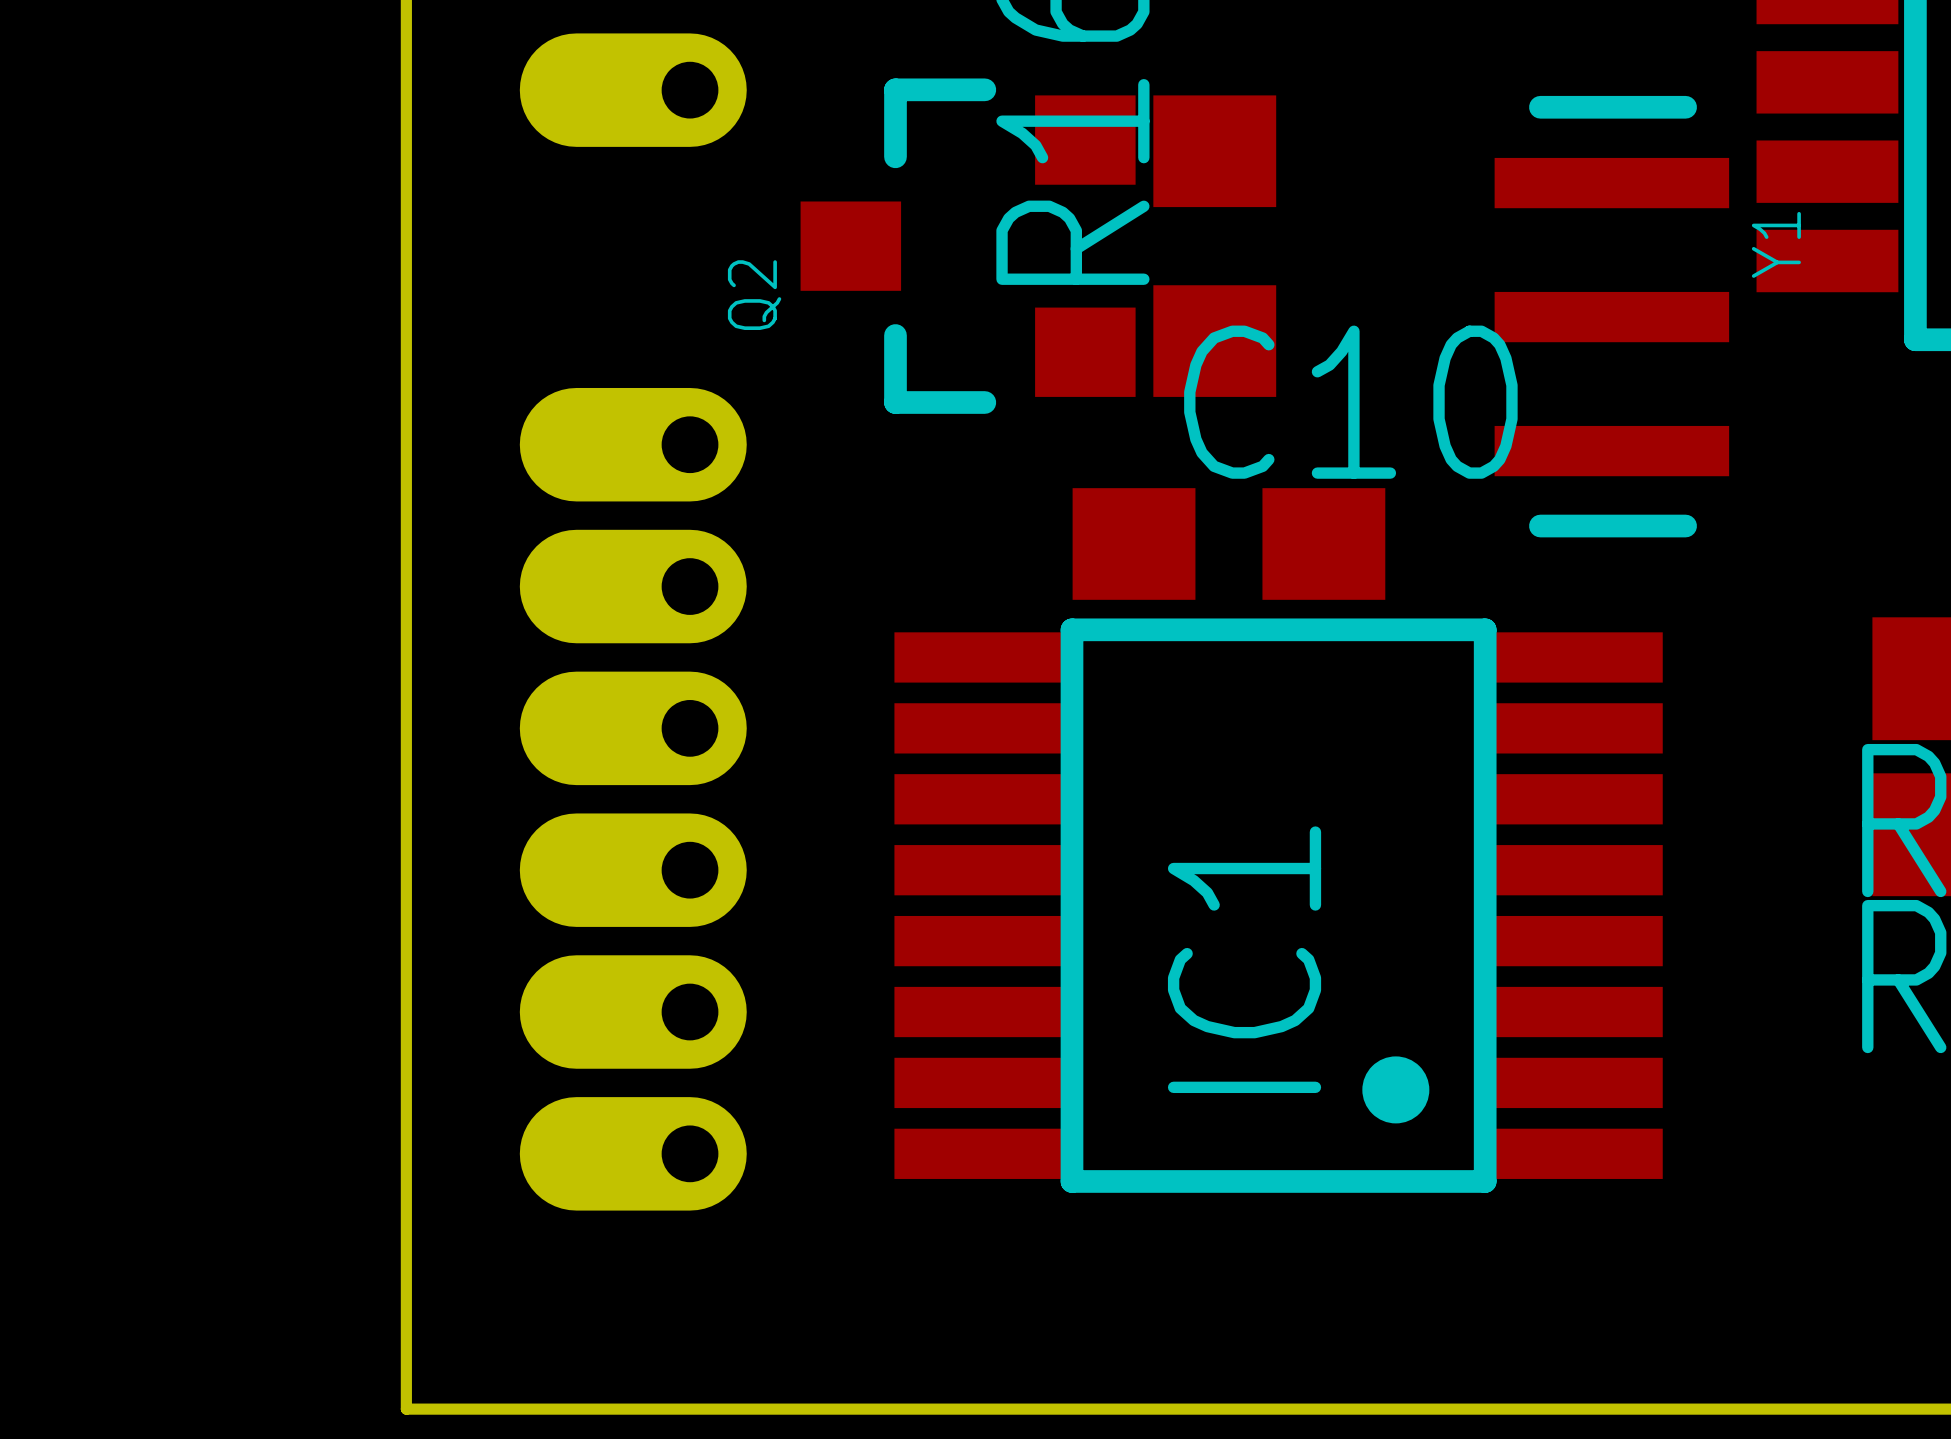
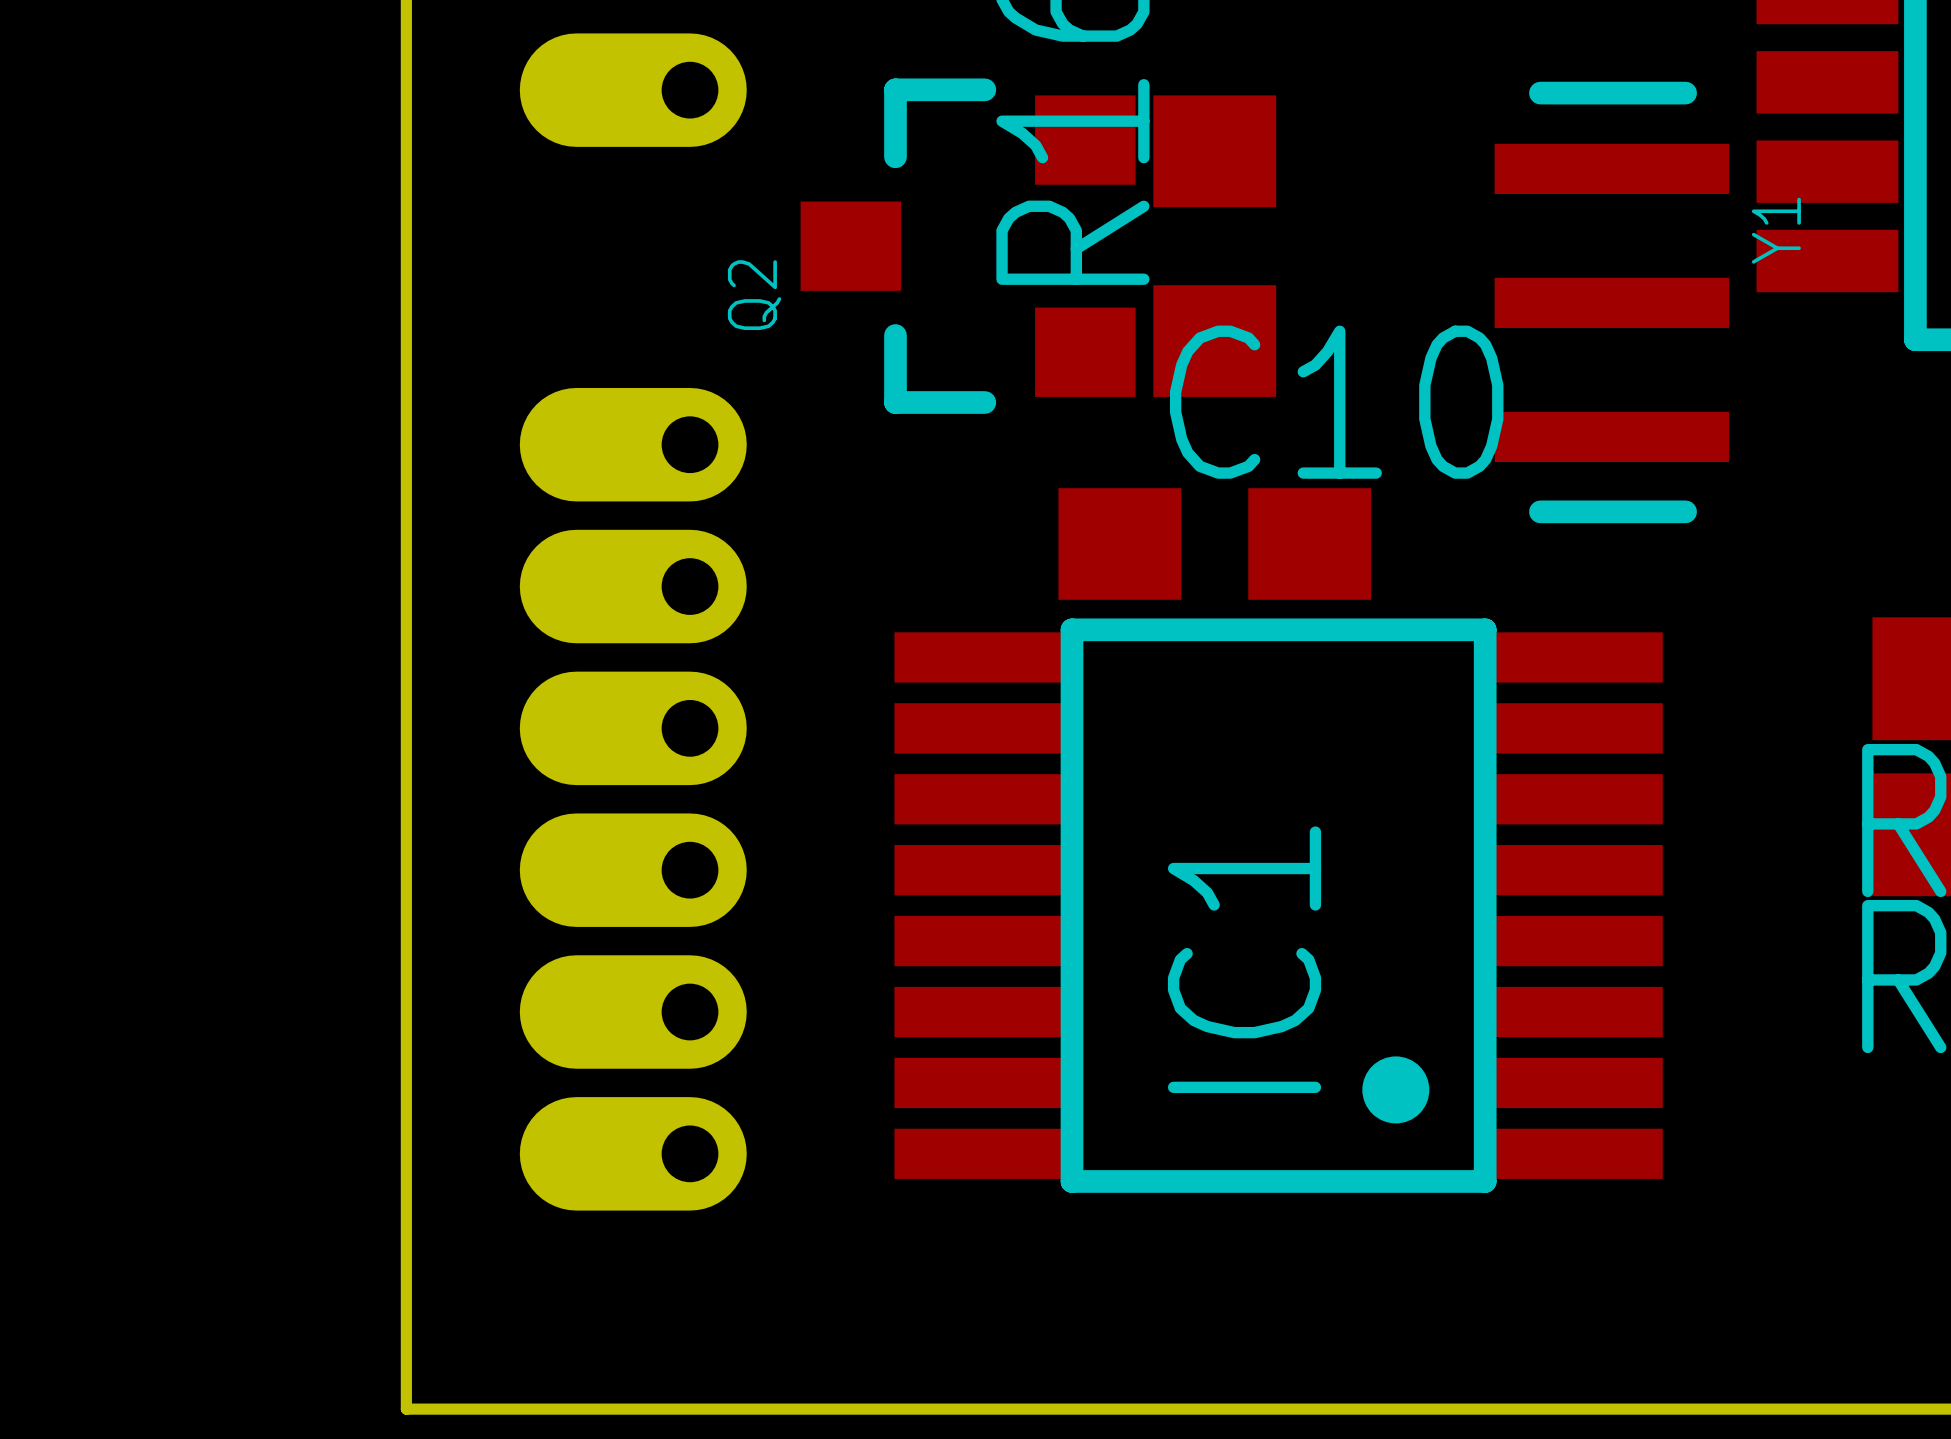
Y1 position: (1611, 316) -> (1611, 302)
C10 position: (1228, 543) -> (1214, 543)

